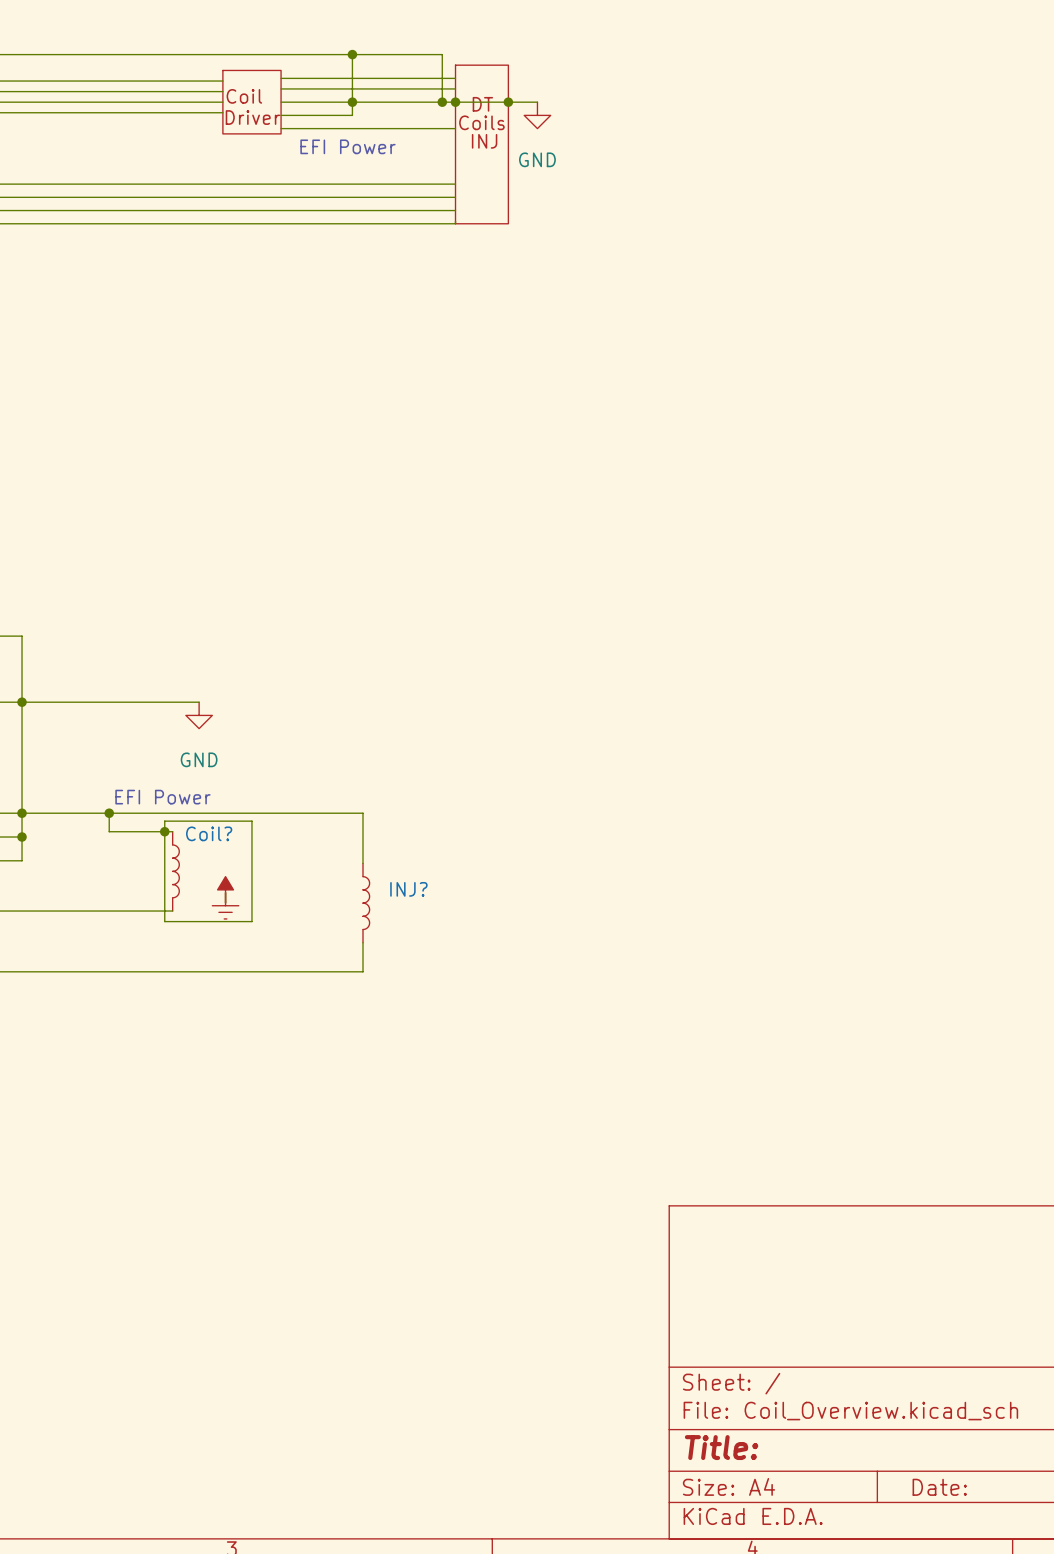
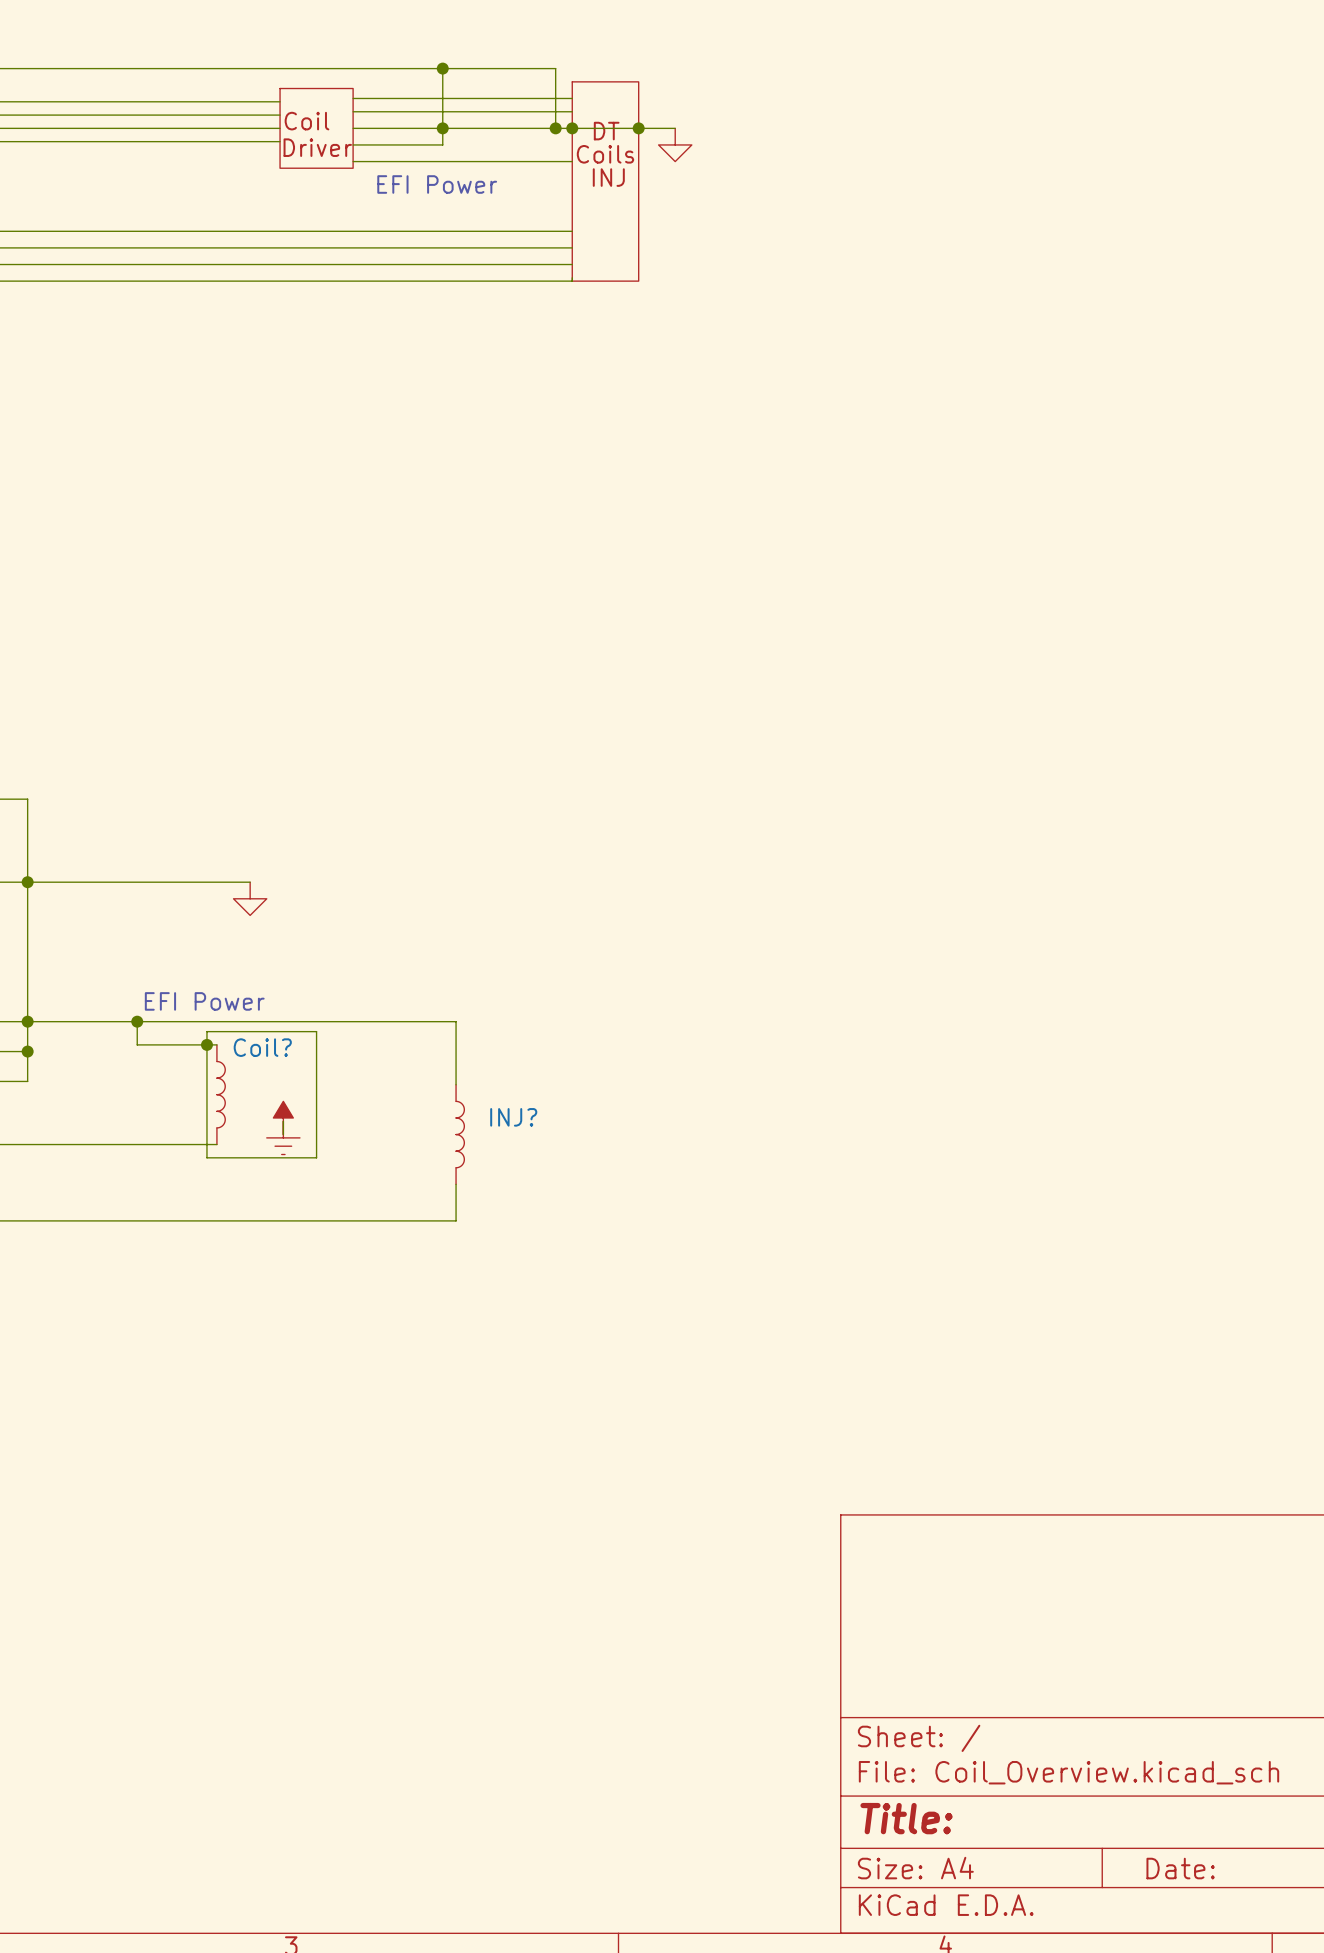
power symbol text: GND (537, 159) -> none
power symbol text: GND (199, 759) -> none

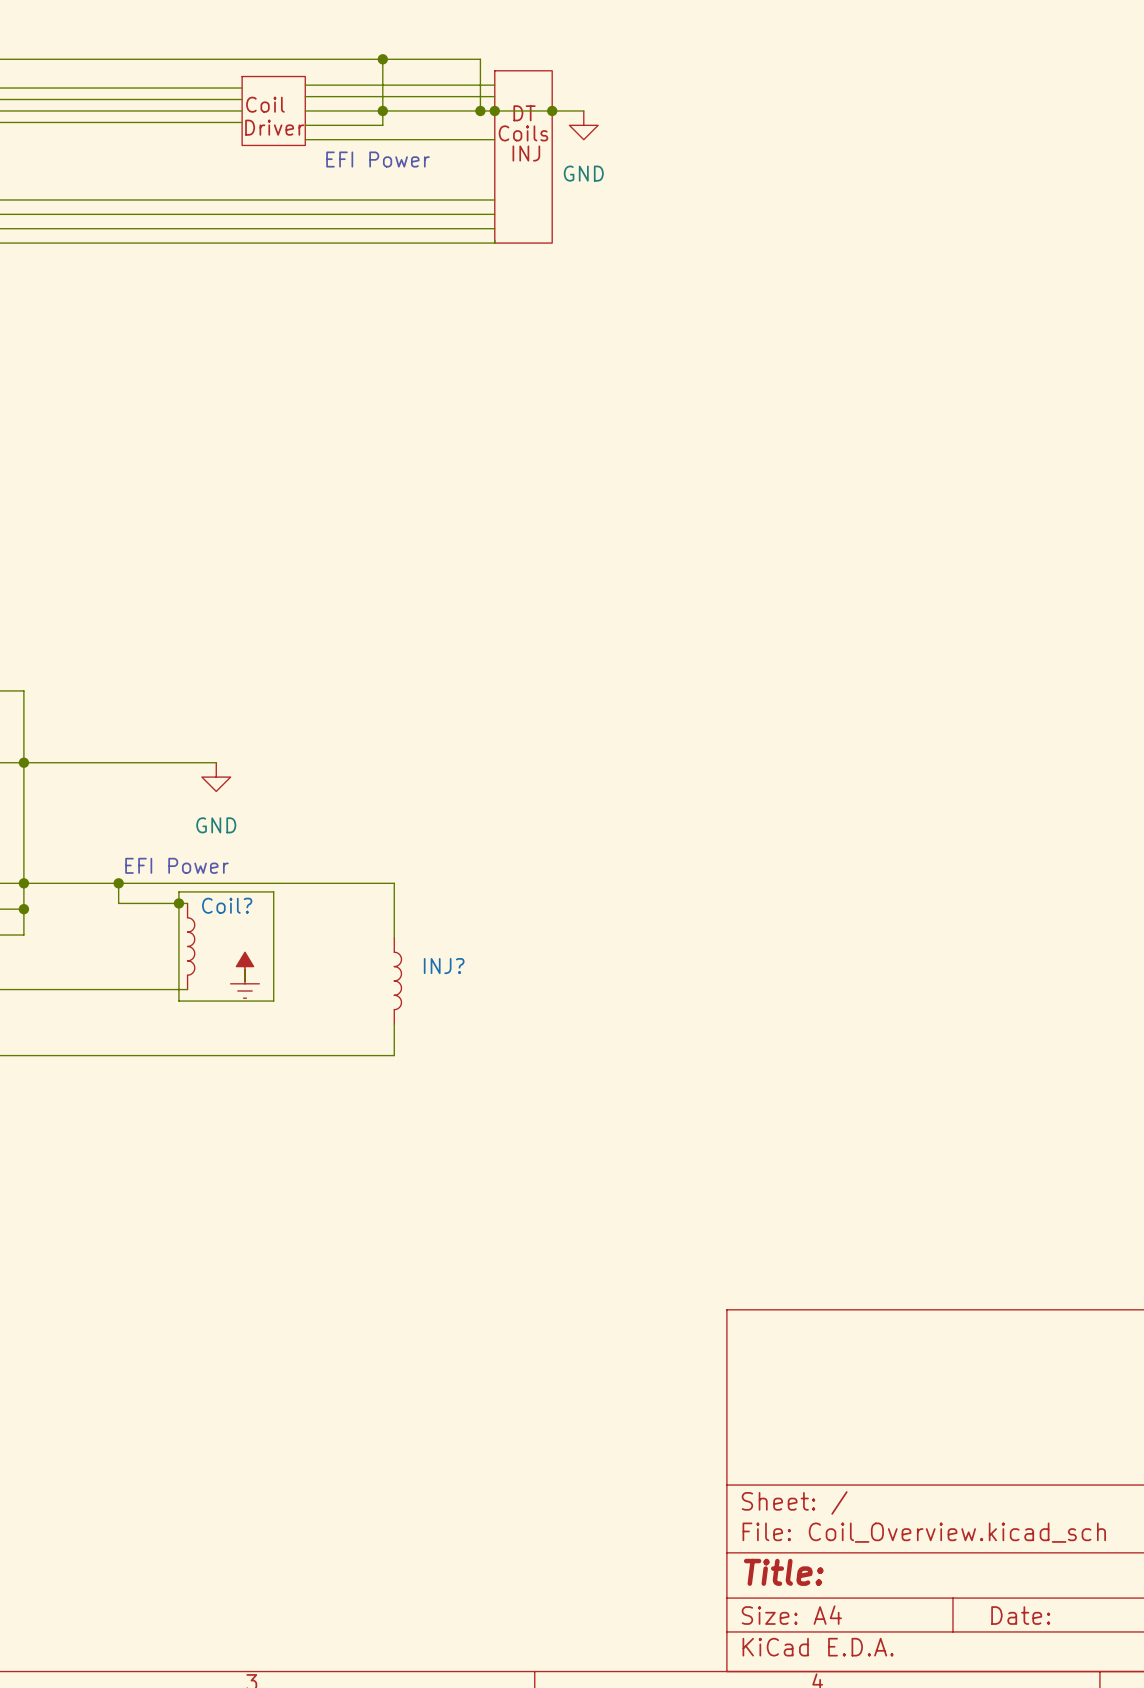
power symbol text: none -> GND (583, 173)
power symbol text: none -> GND (216, 825)

